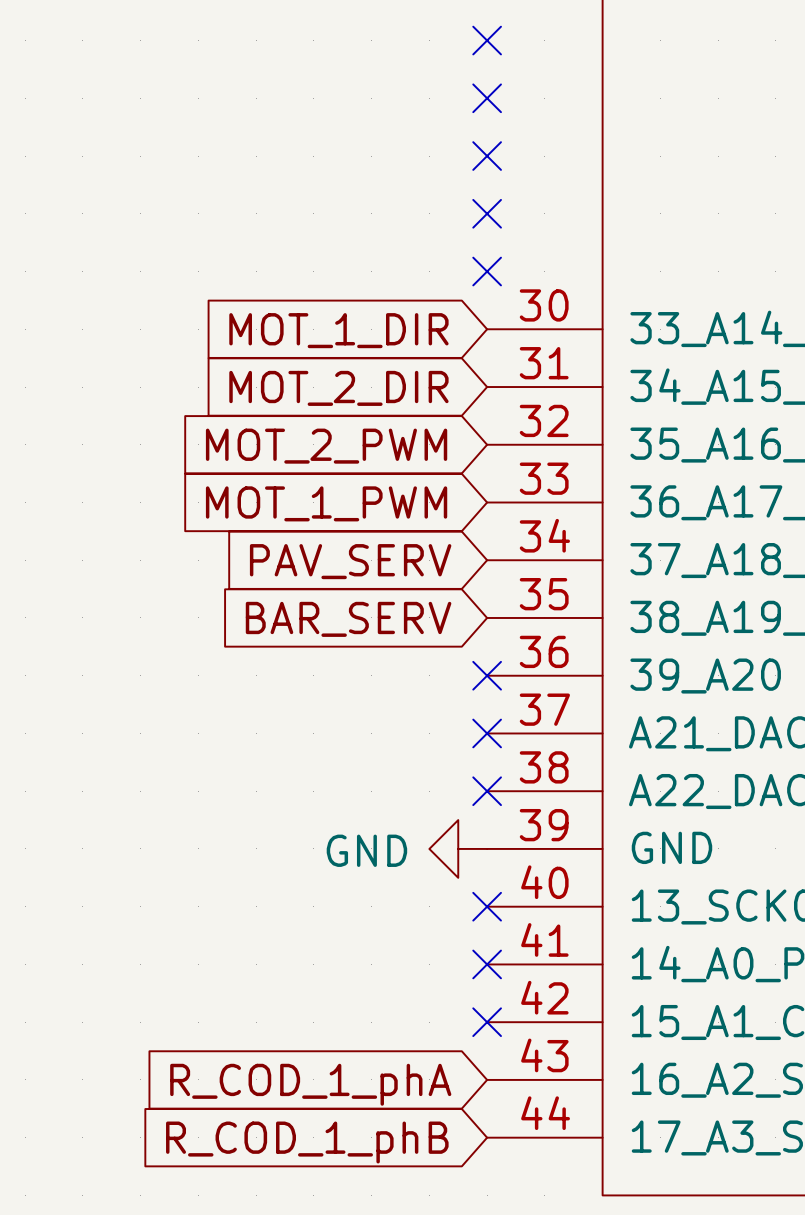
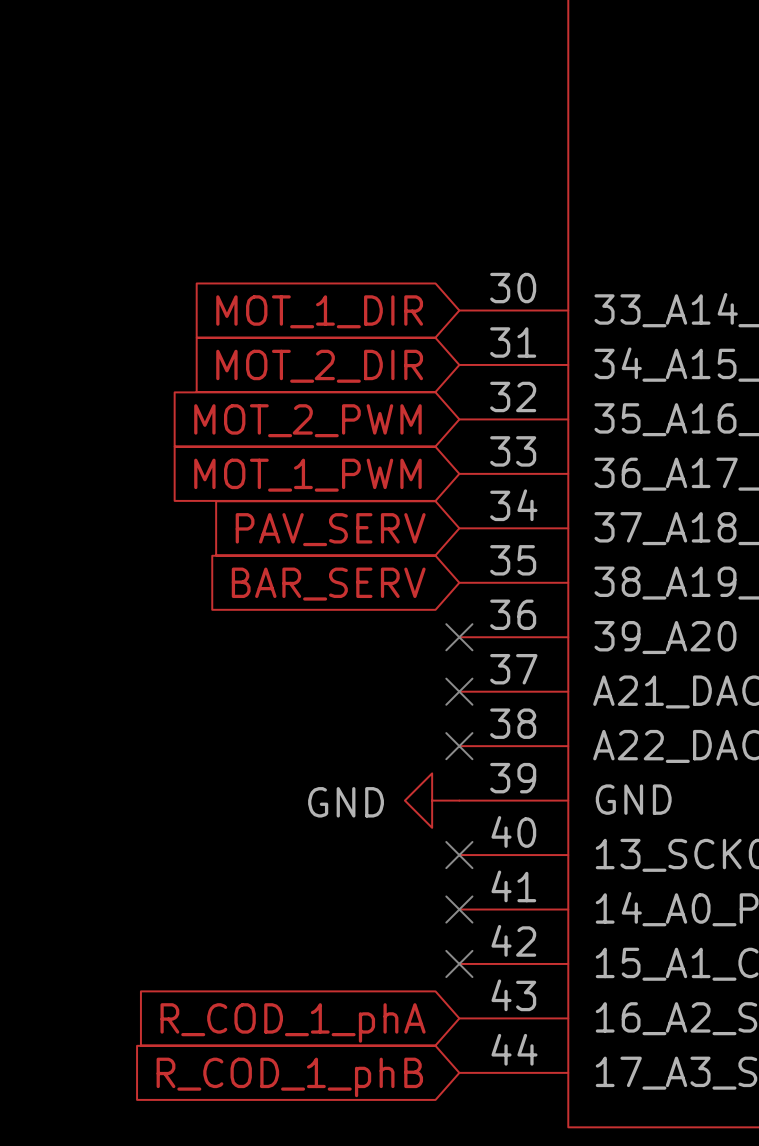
no-connect mark: (487, 40) -> none
no-connect mark: (487, 98) -> none
no-connect mark: (487, 156) -> none
no-connect mark: (487, 213) -> none
no-connect mark: (487, 271) -> none

